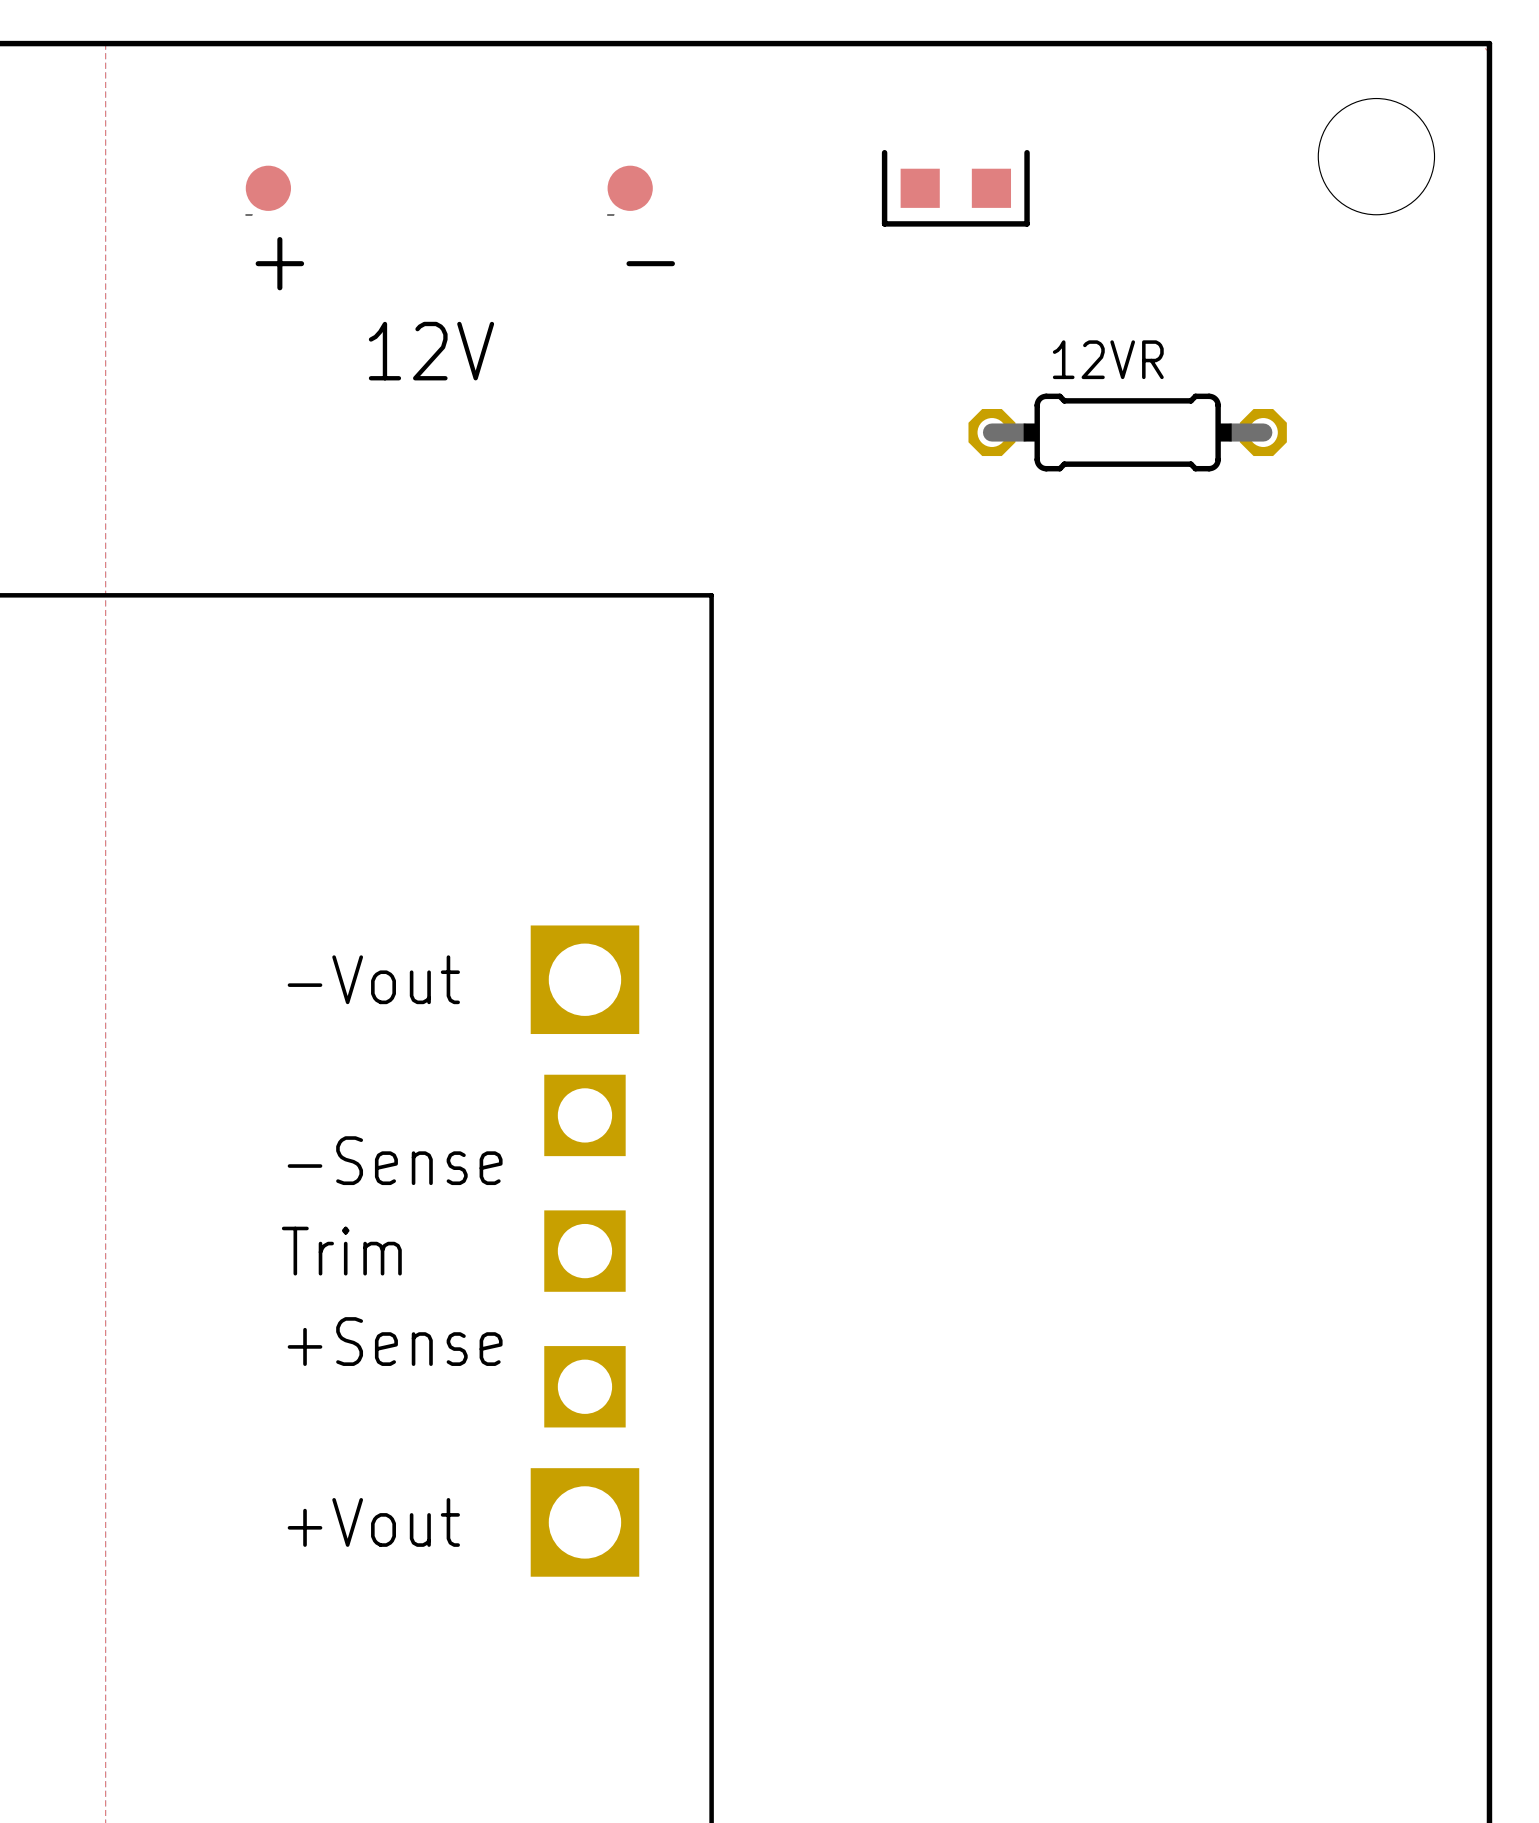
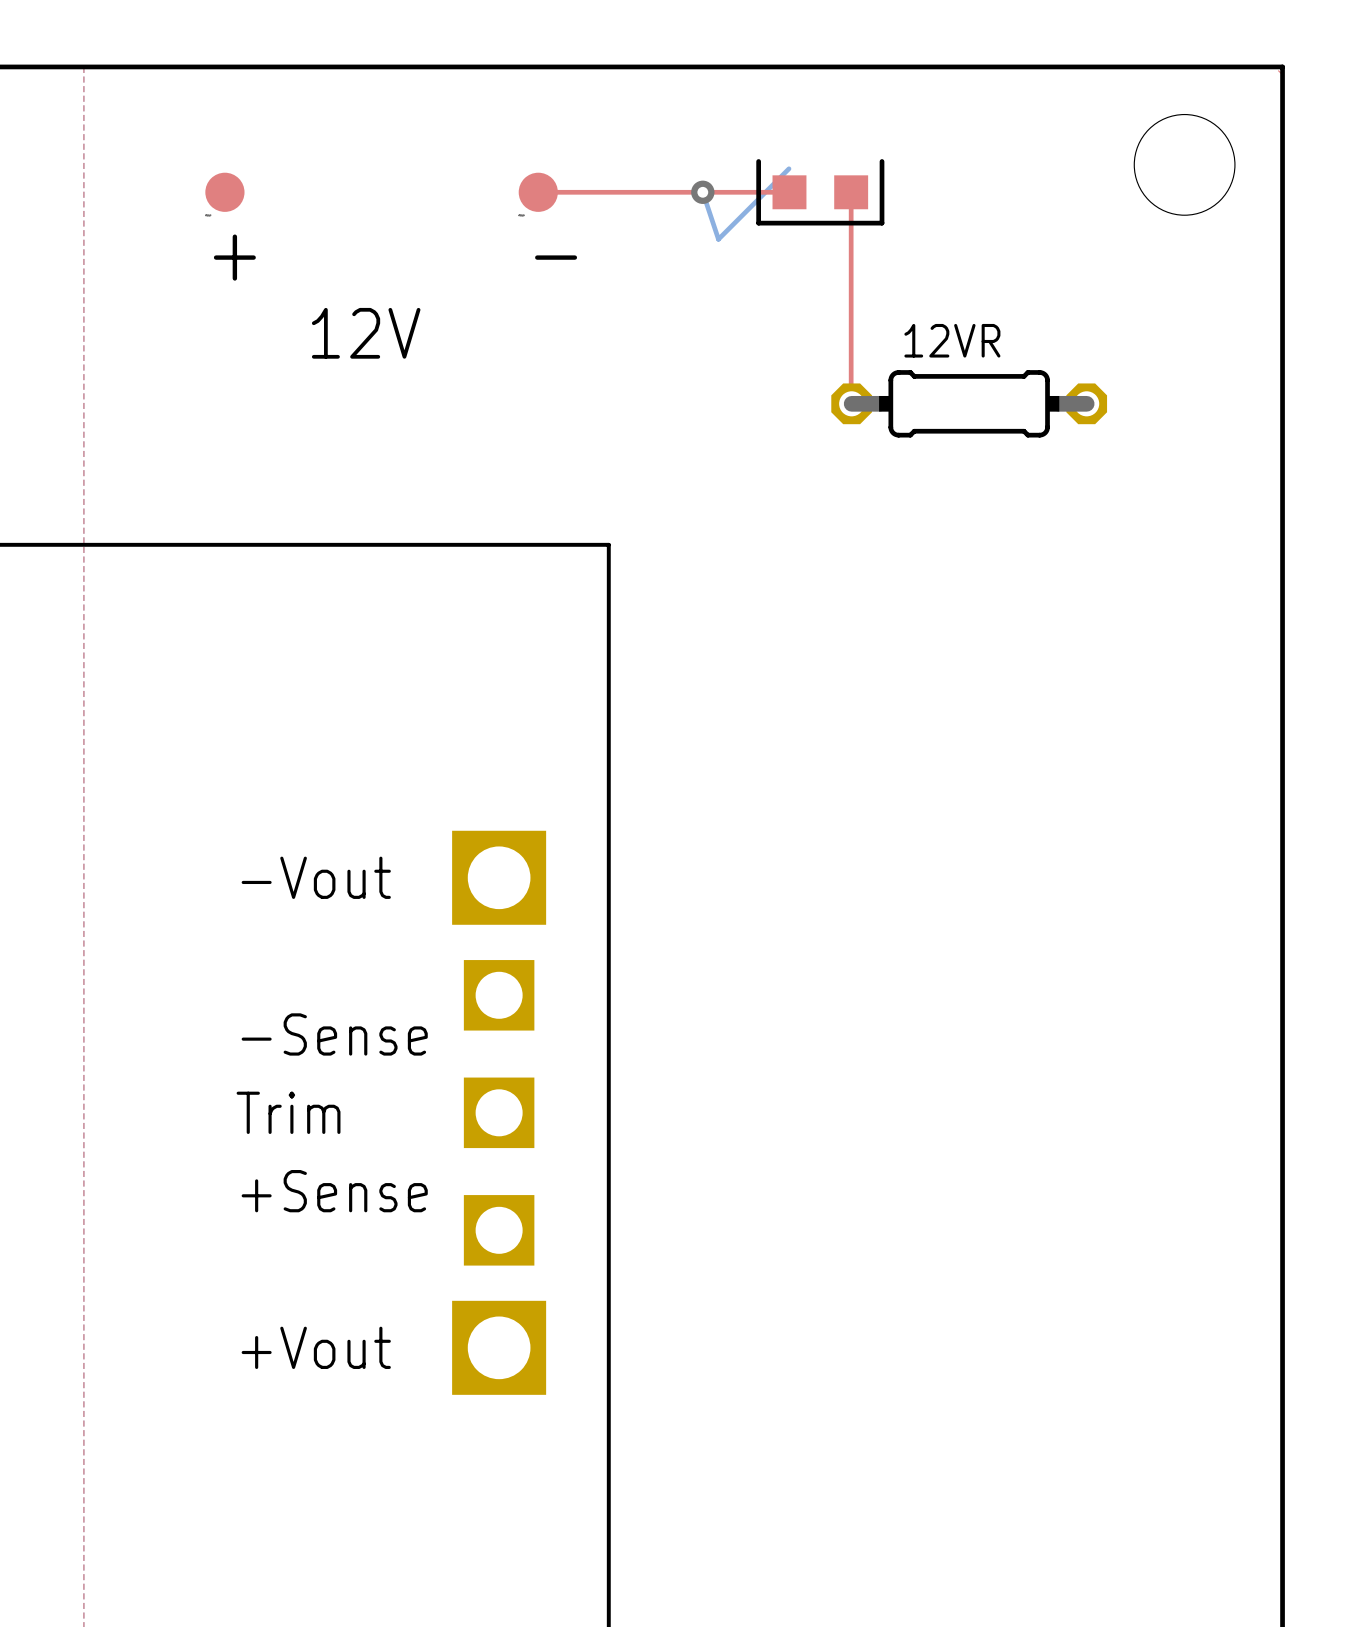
bottom track: none -> (788, 168) (718, 239) (702, 192)
top track: none -> (538, 192) (789, 192)
via: none -> (702, 192)
top track: none -> (851, 192) (851, 403)

